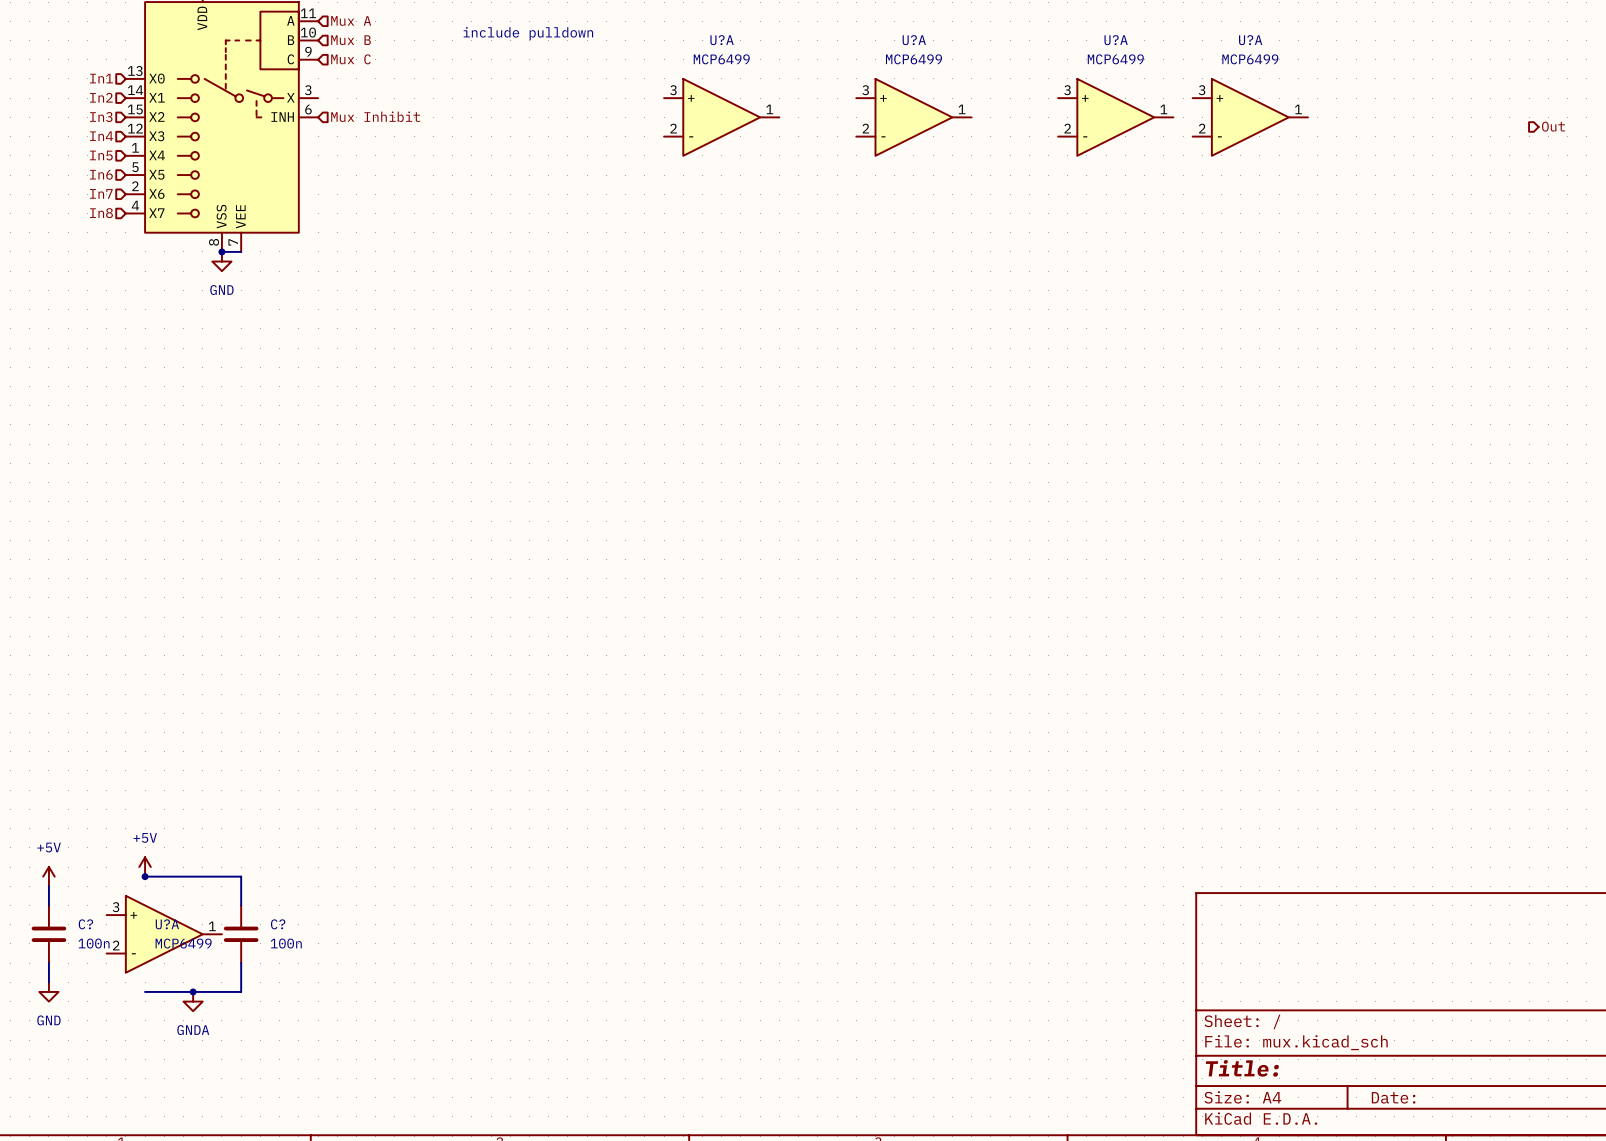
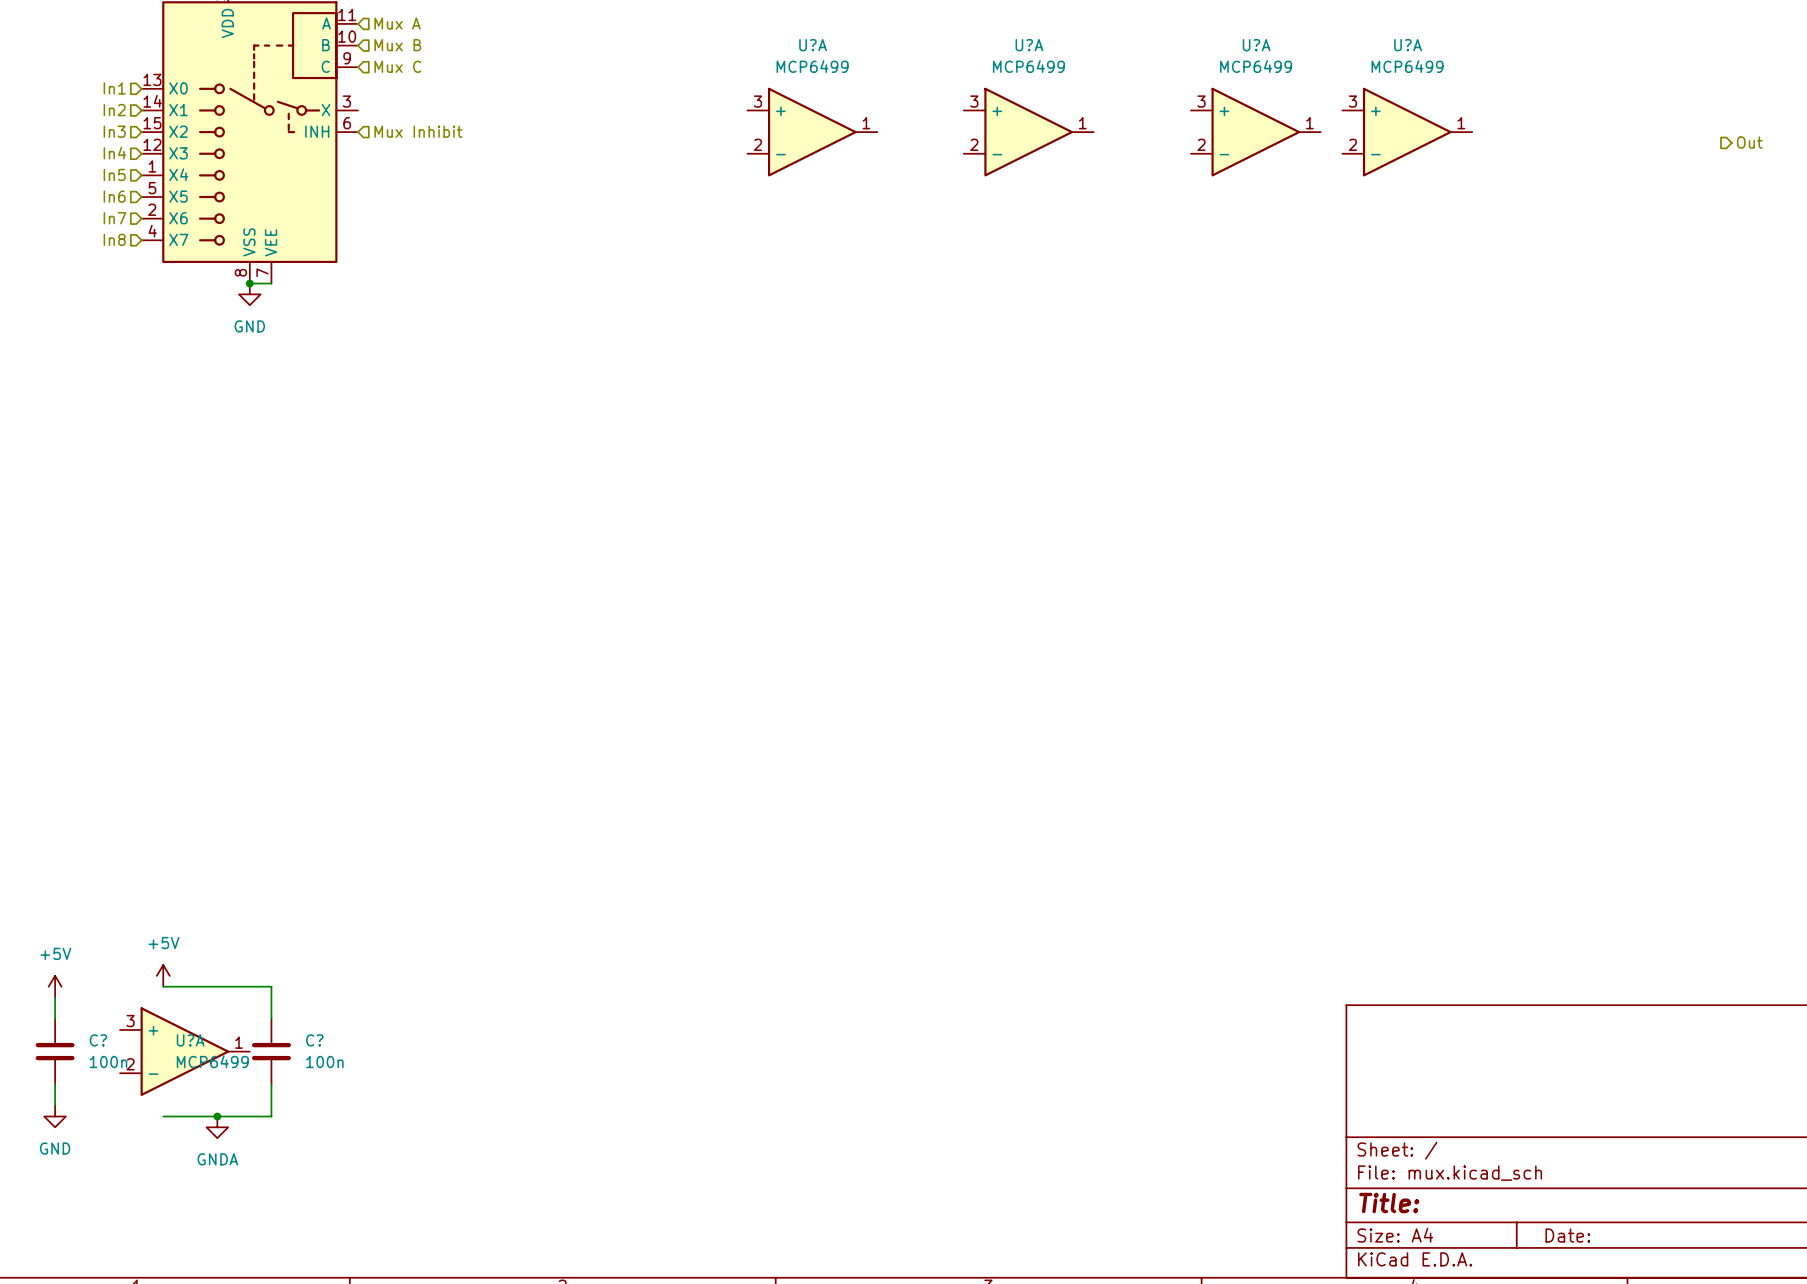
text: include pulldown (528, 33) -> none
junction: (145, 876) -> none

